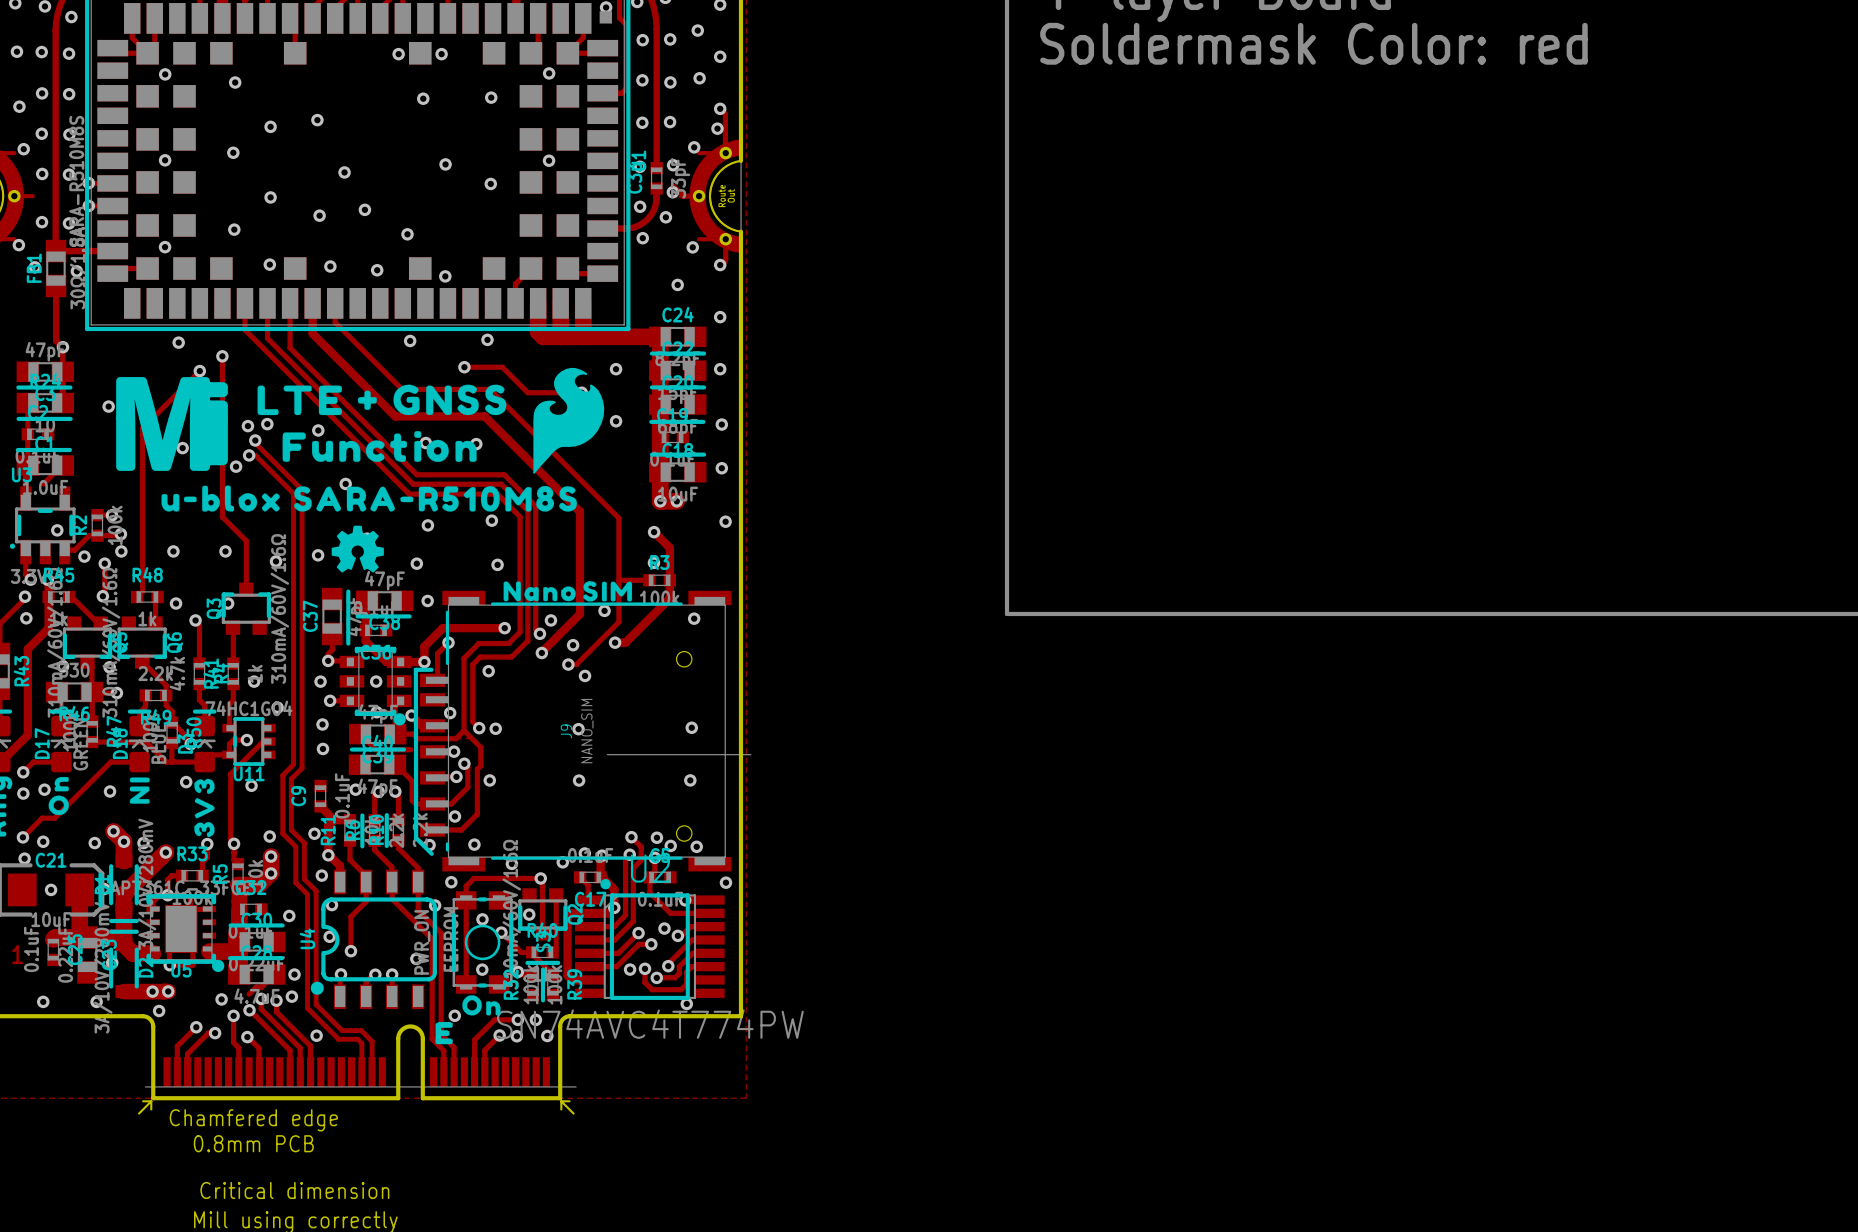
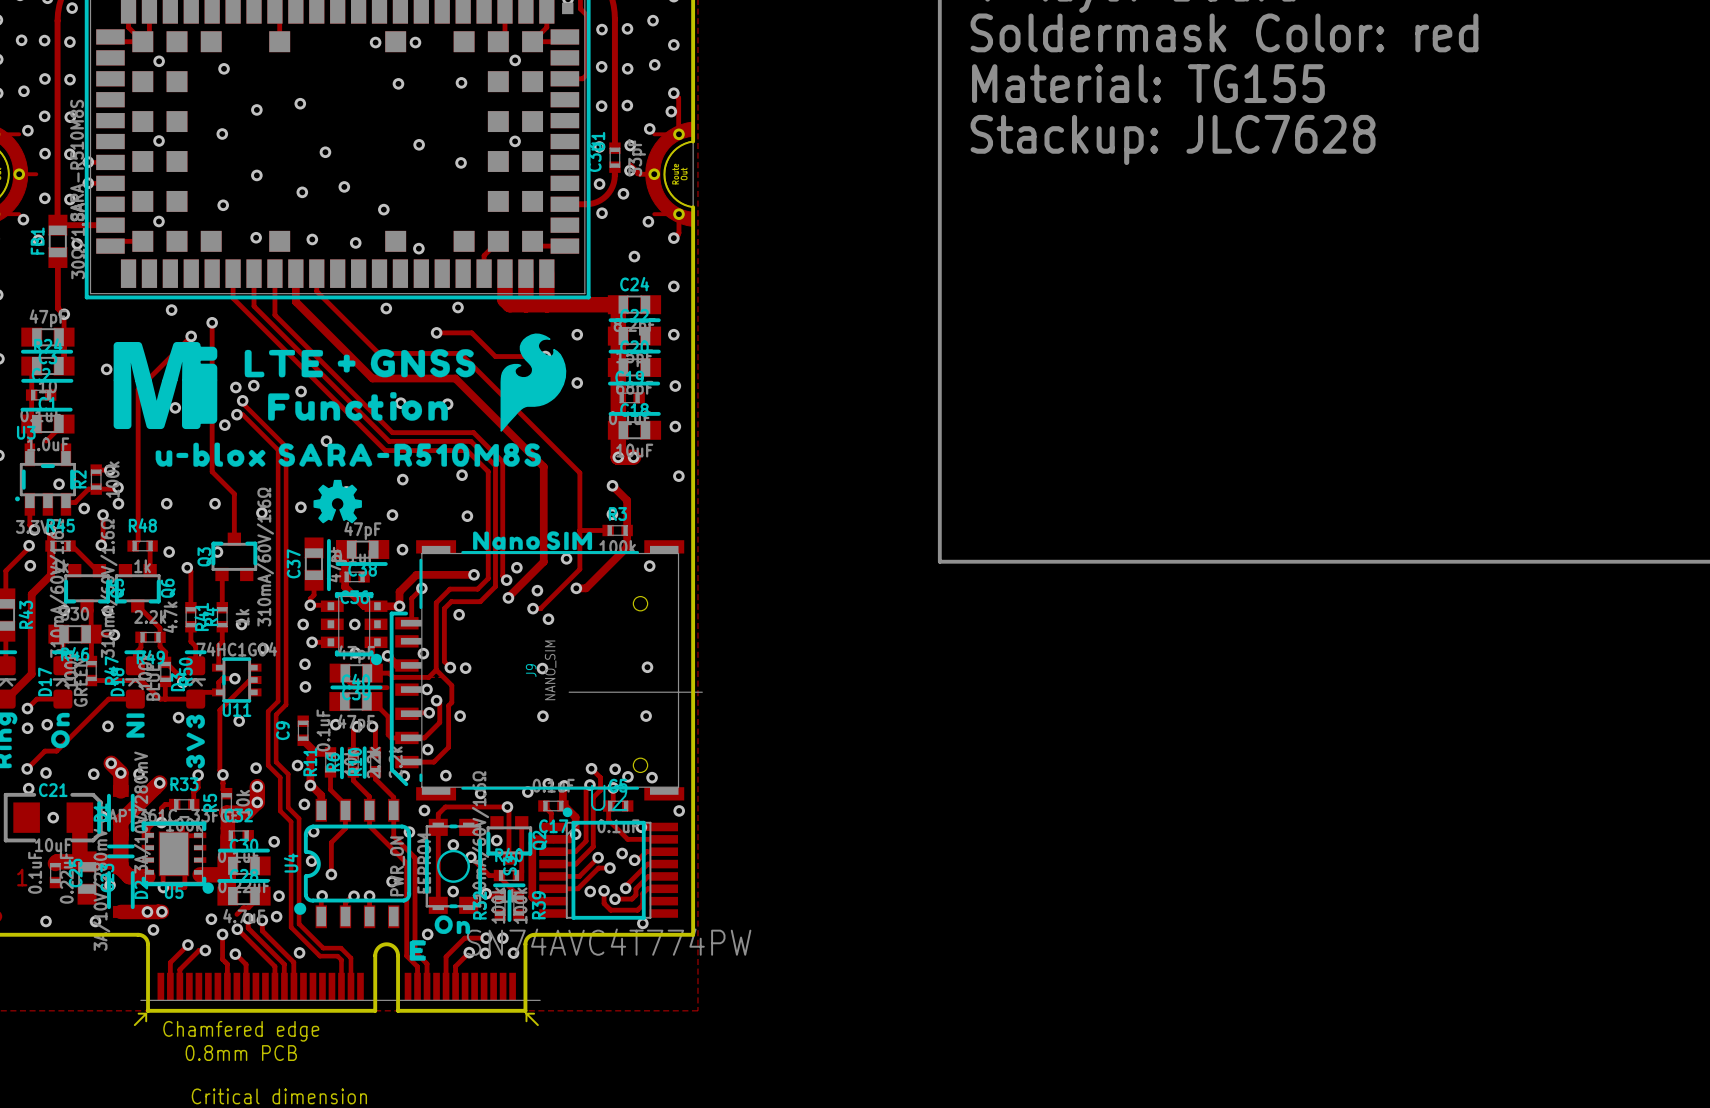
text: none -> Material: TG155 (1148, 83)
text: none -> Stackup: JLC7628 (1173, 139)

